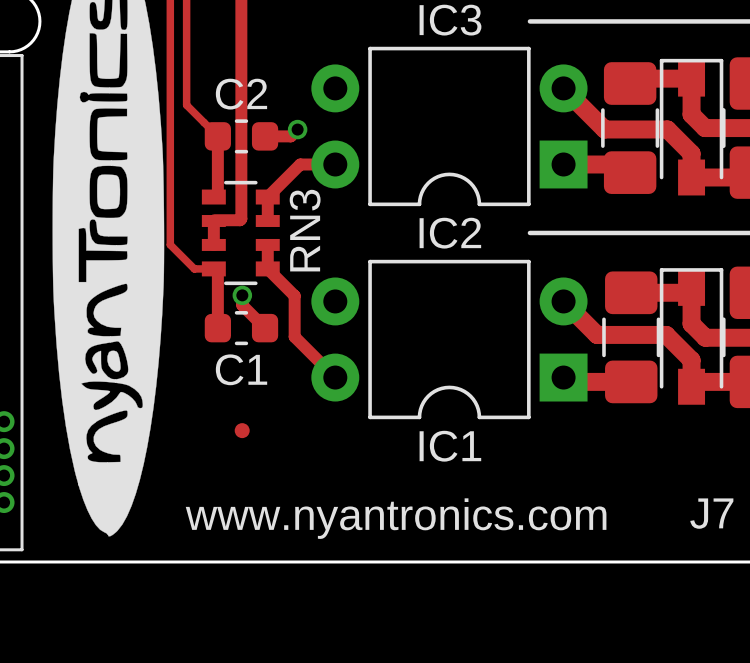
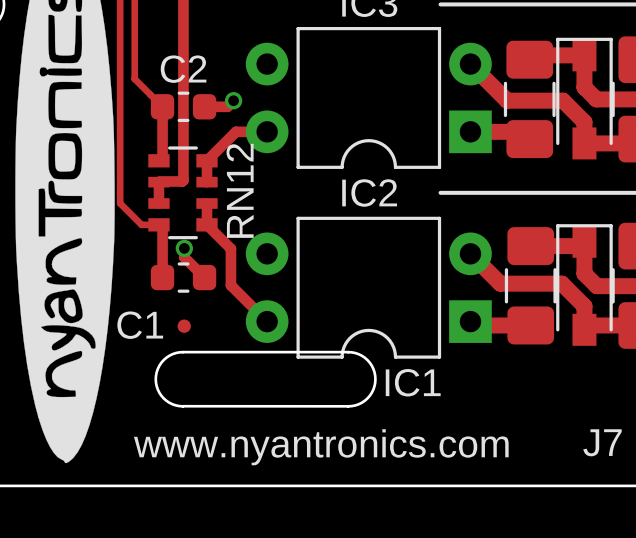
RN3 name: RN3 (305, 230) -> RN12 (240, 190)
C1 name position: C1 (241, 369) -> C1 (140, 325)
board edge: none -> (182, 352) (351, 352) (361, 355) (369, 362) (374, 372) (375, 382) (367, 398) (351, 406) (179, 406) (169, 402) (161, 395) (155, 379) (157, 368) (163, 360) (172, 354) (182, 352)
part position: (242, 430) -> (184, 326)
IC1 name position: IC1 (450, 446) -> IC1 (413, 382)

